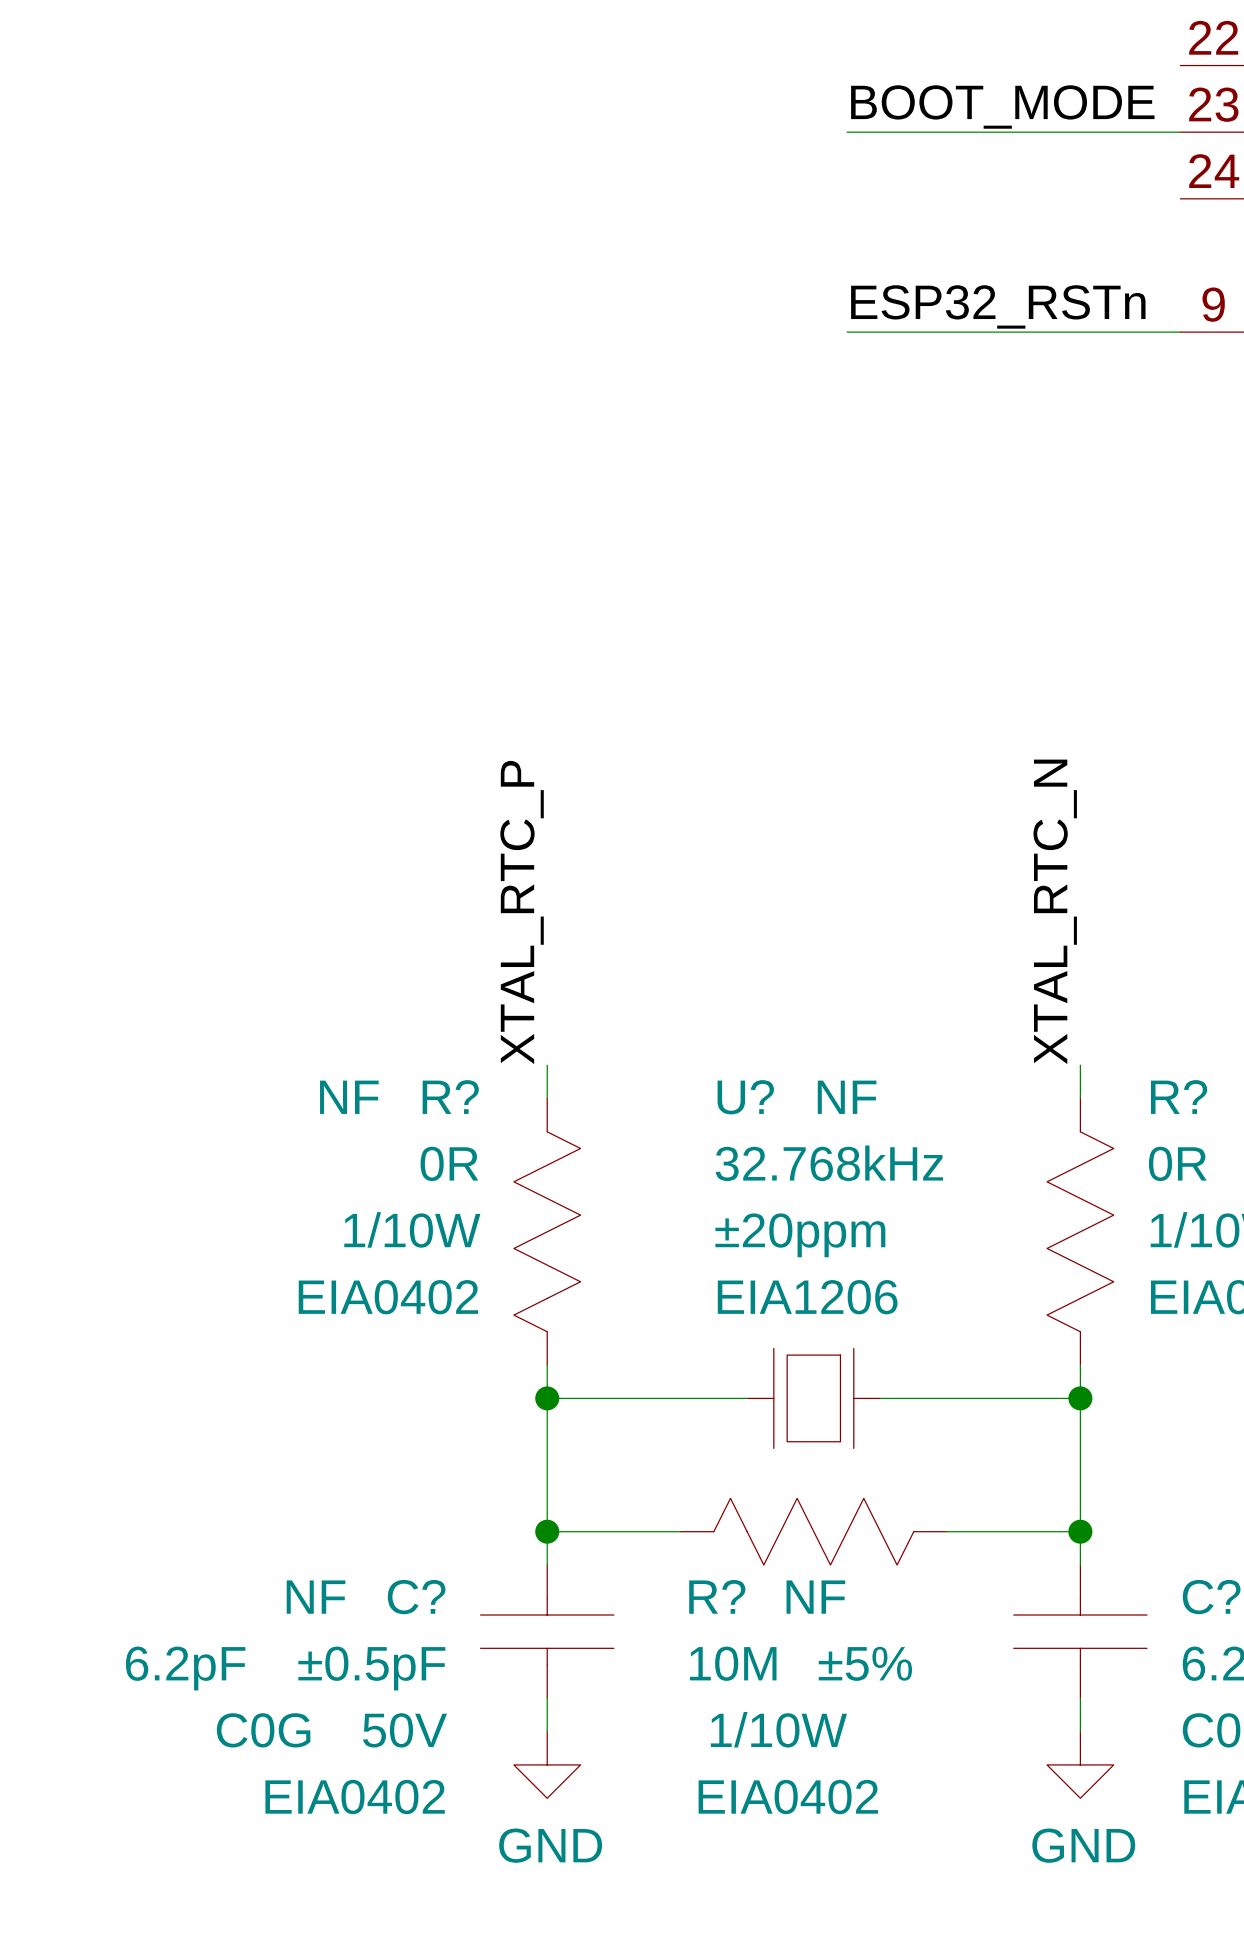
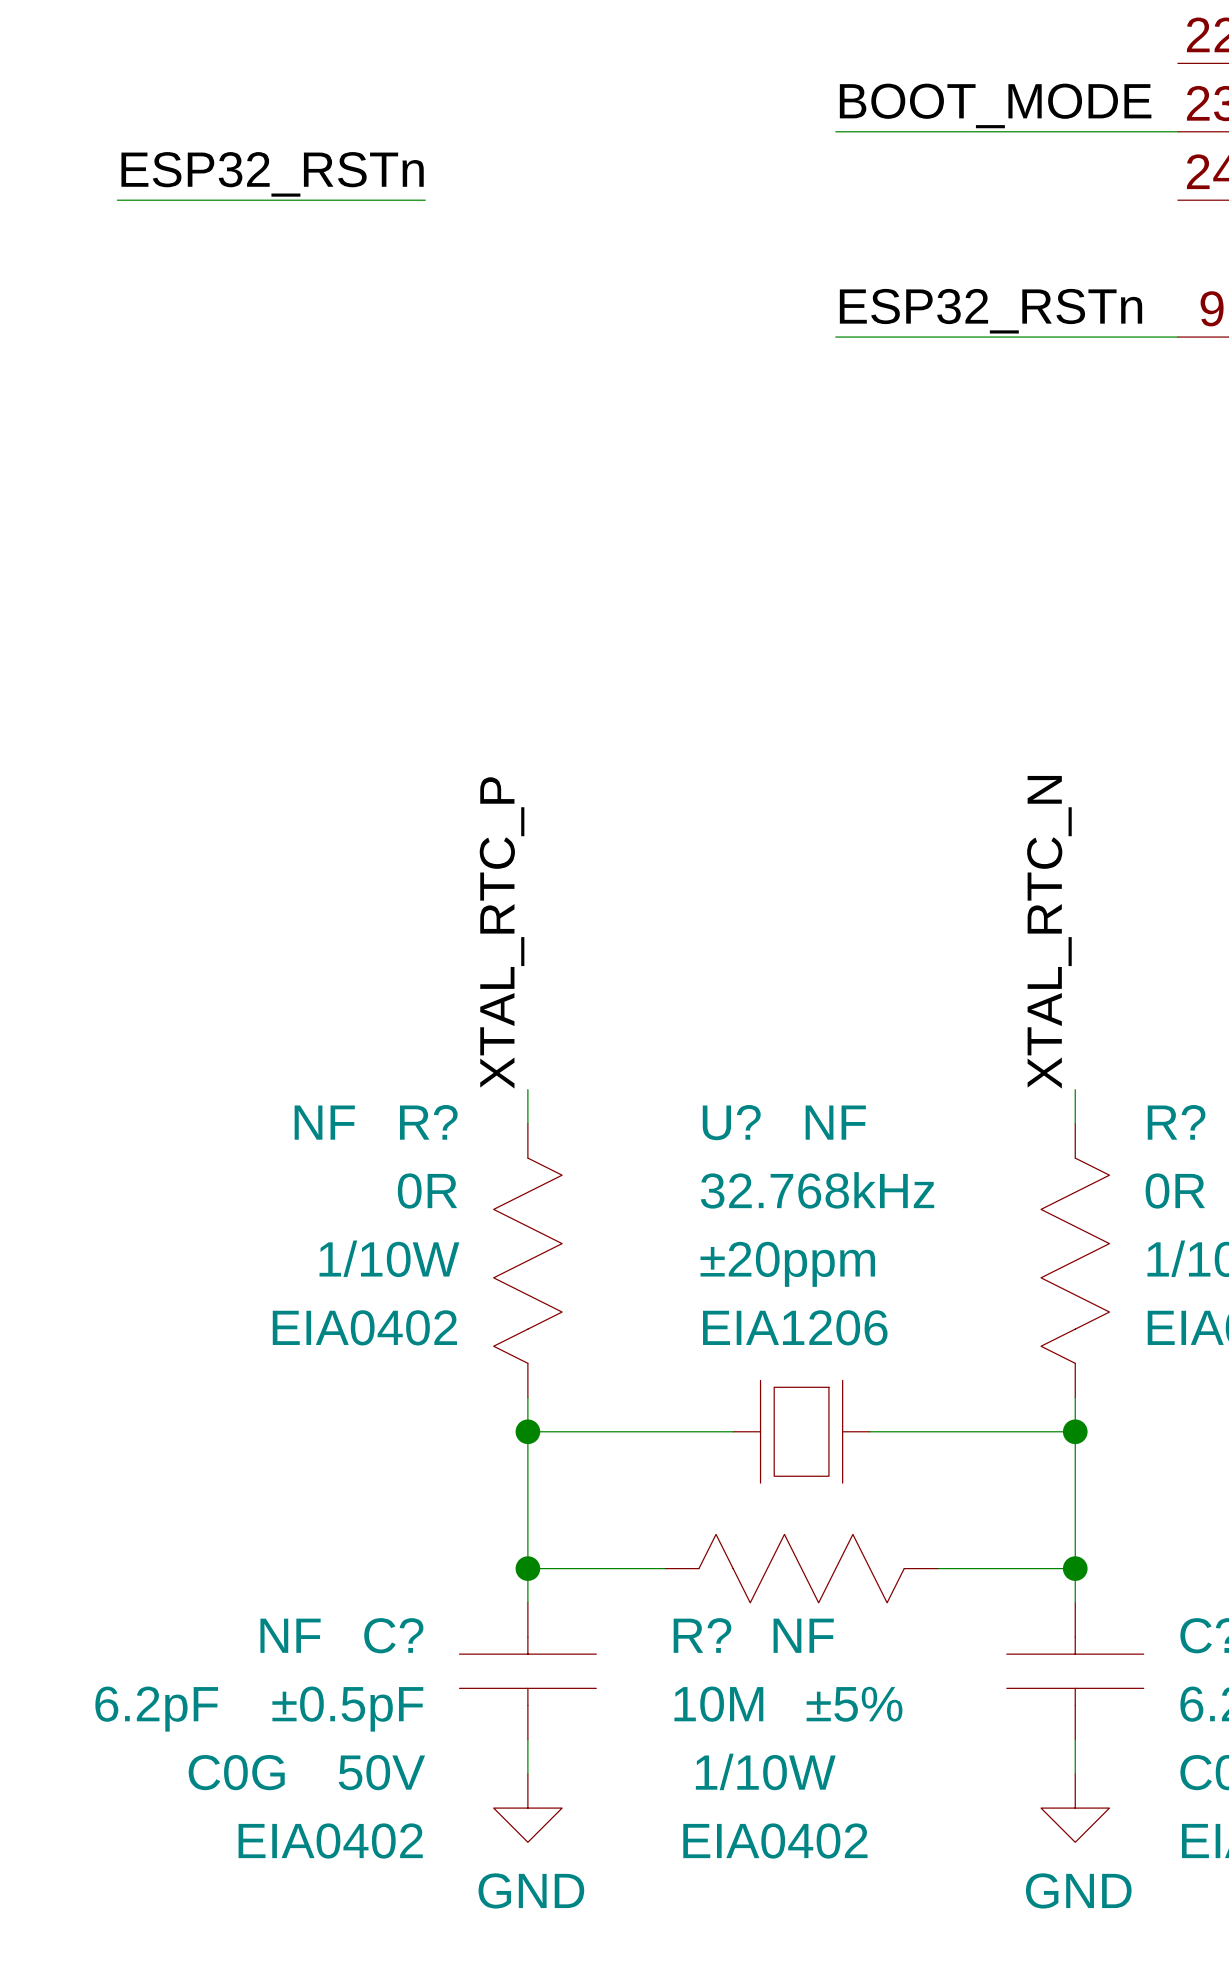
label: none -> ESP32_RSTn (272, 174)
wire: none -> (117, 200) (425, 200)

